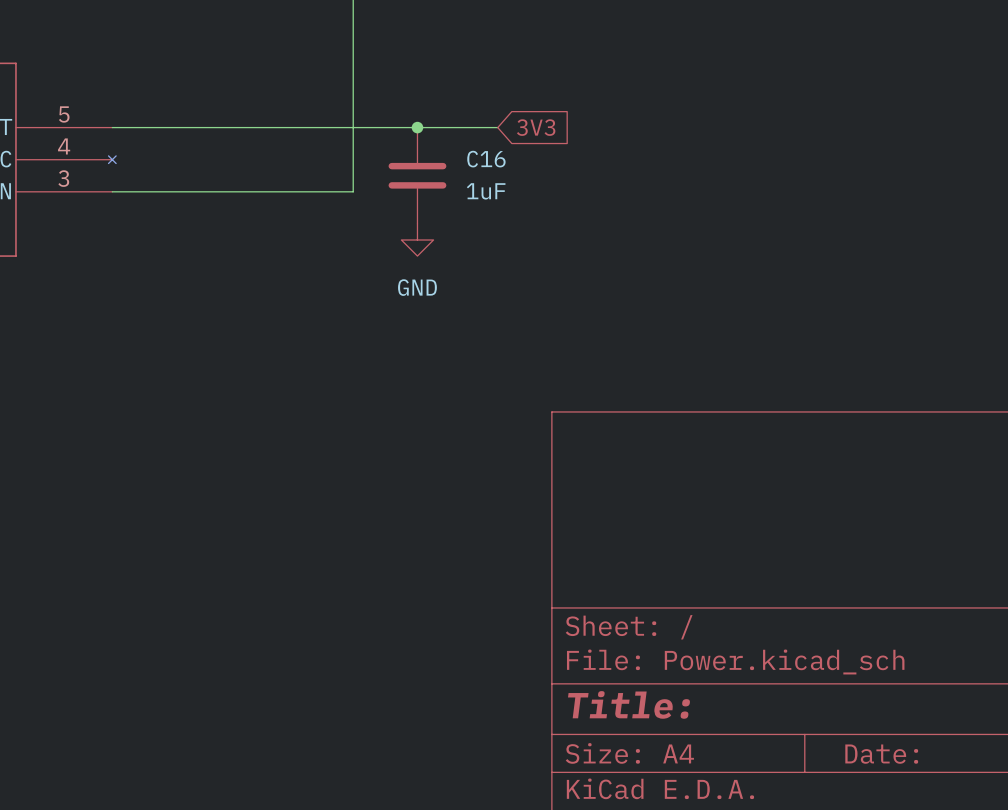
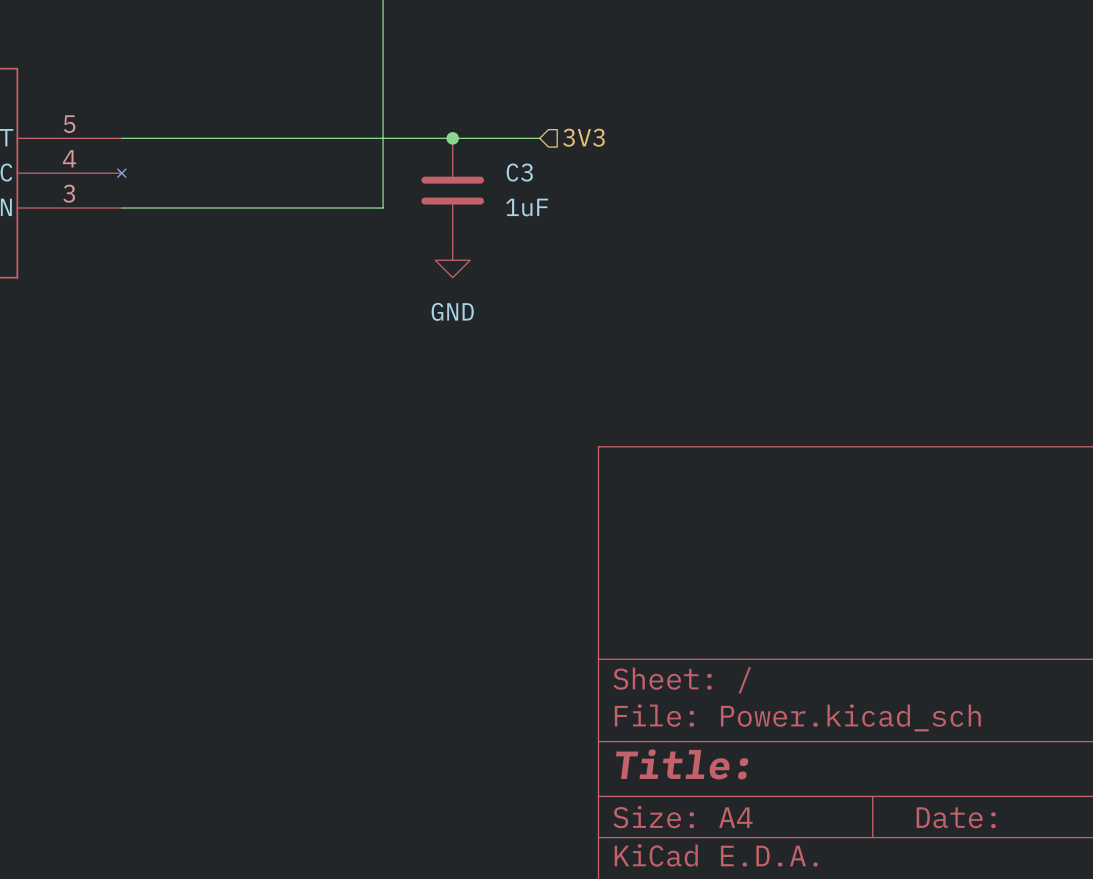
hierarchical label: none -> 3V3 (583, 137)
global label: 3V3 (536, 127) -> none
C16 name: C16 (486, 159) -> C3 (519, 172)

